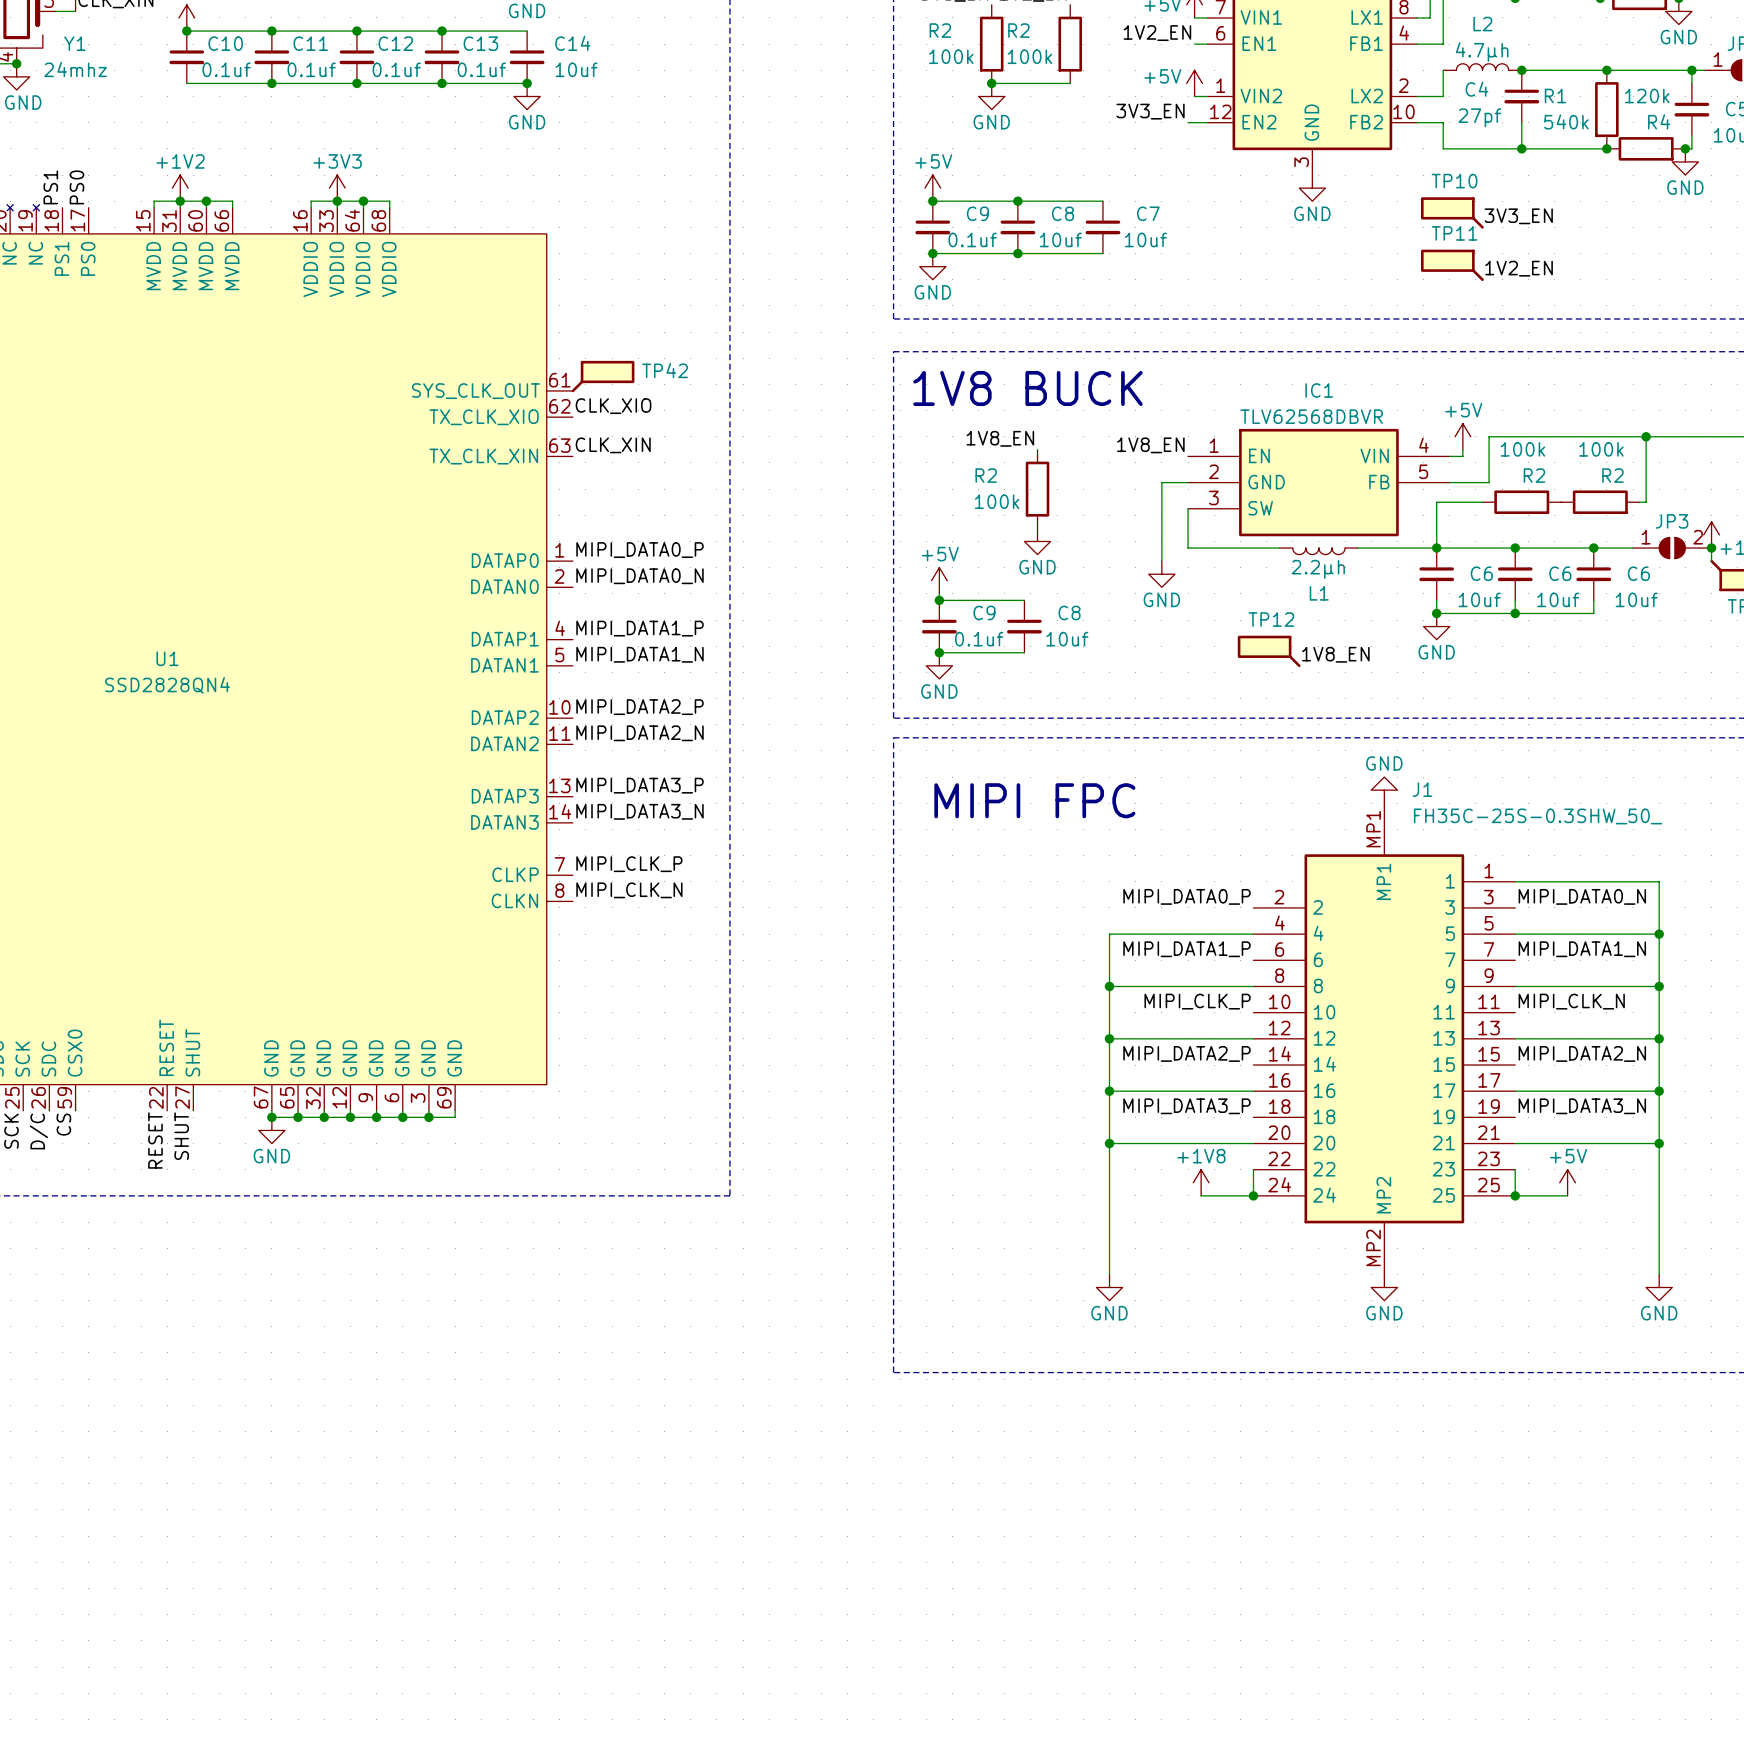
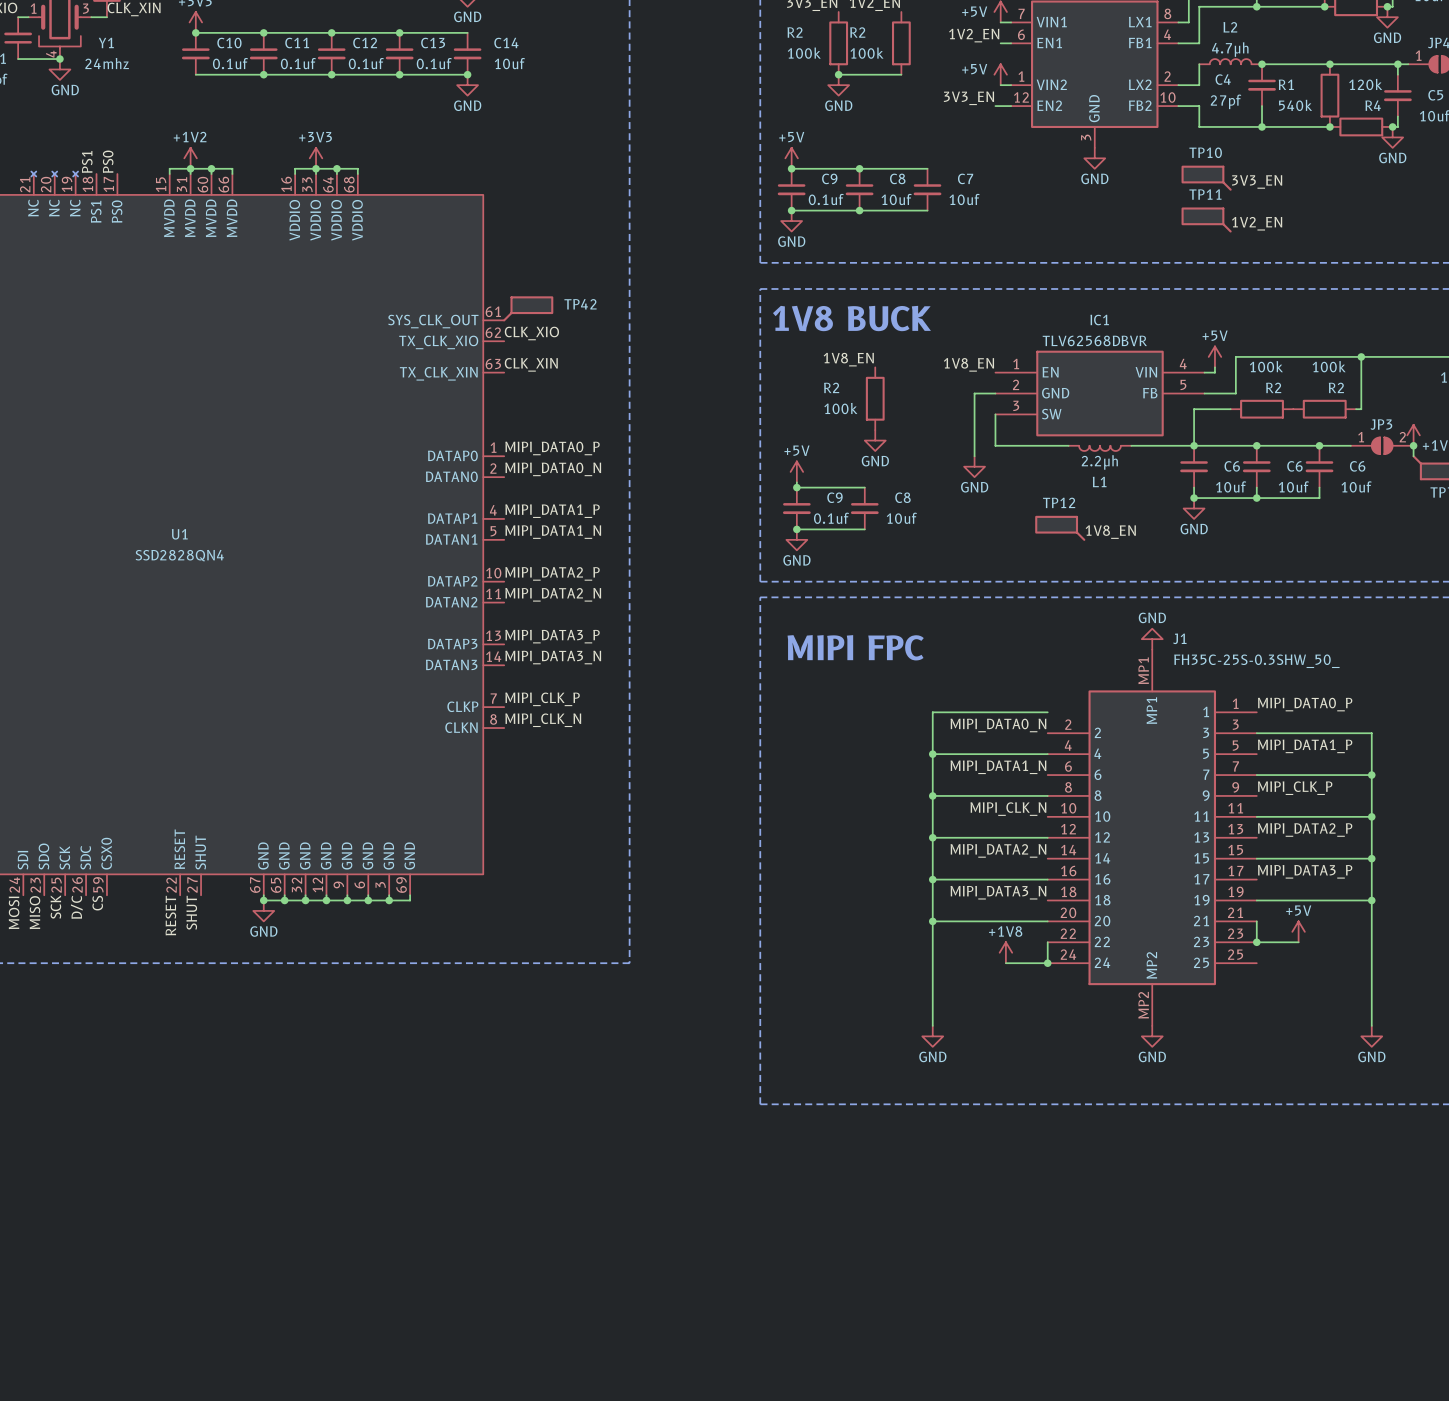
label: none -> MIPI_DATA0_P (1305, 704)
wire: none -> (1047, 712) (932, 712) (932, 754)
wire: (1515, 881) (1659, 881) (1659, 907) -> (1256, 733) (1371, 733)
label: MIPI_DATA0_P (1187, 896) -> MIPI_DATA0_N (998, 725)
label: MIPI_DATA0_N (1582, 896) -> none
label: none -> MIPI_DATA1_P (1305, 746)
junction: none -> (932, 754)
wire: (1515, 934) (1659, 934) -> (1256, 900) (1371, 900)
junction: (1659, 934) -> none
label: MIPI_DATA1_P (1187, 949) -> MIPI_DATA1_N (998, 767)
label: MIPI_DATA1_N (1582, 949) -> none
junction: none -> (1371, 775)
wire: (1515, 986) (1659, 986) -> (1256, 775) (1371, 775)
junction: (1659, 986) -> none
label: MIPI_CLK_P (1197, 1001) -> MIPI_CLK_N (1008, 809)
label: MIPI_CLK_N (1571, 1001) -> MIPI_CLK_P (1295, 788)
junction: none -> (1371, 816)
label: none -> MIPI_DATA2_P (1305, 830)
wire: (1515, 1038) (1659, 1038) -> (1256, 816) (1371, 816)
junction: (1659, 1038) -> none
label: MIPI_DATA2_P (1187, 1053) -> MIPI_DATA2_N (998, 850)
label: MIPI_DATA2_N (1582, 1053) -> none
junction: none -> (1371, 858)
label: none -> MIPI_DATA3_P (1305, 871)
wire: (1515, 1091) (1659, 1091) -> (1256, 858) (1371, 858)
junction: (1659, 1091) -> none
label: MIPI_DATA3_P (1187, 1106) -> MIPI_DATA3_N (998, 892)
label: MIPI_DATA3_N (1582, 1106) -> none
junction: none -> (1371, 900)
wire: (1515, 1143) (1659, 1143) -> (1256, 921) (1256, 942) (1298, 942)
junction: (1659, 1143) -> none
wire: (1515, 1169) (1515, 1195) (1567, 1195) -> none
power symbol position: +5V (1567, 1182) -> +5V (1298, 931)
junction position: (1515, 1195) -> (1256, 942)

